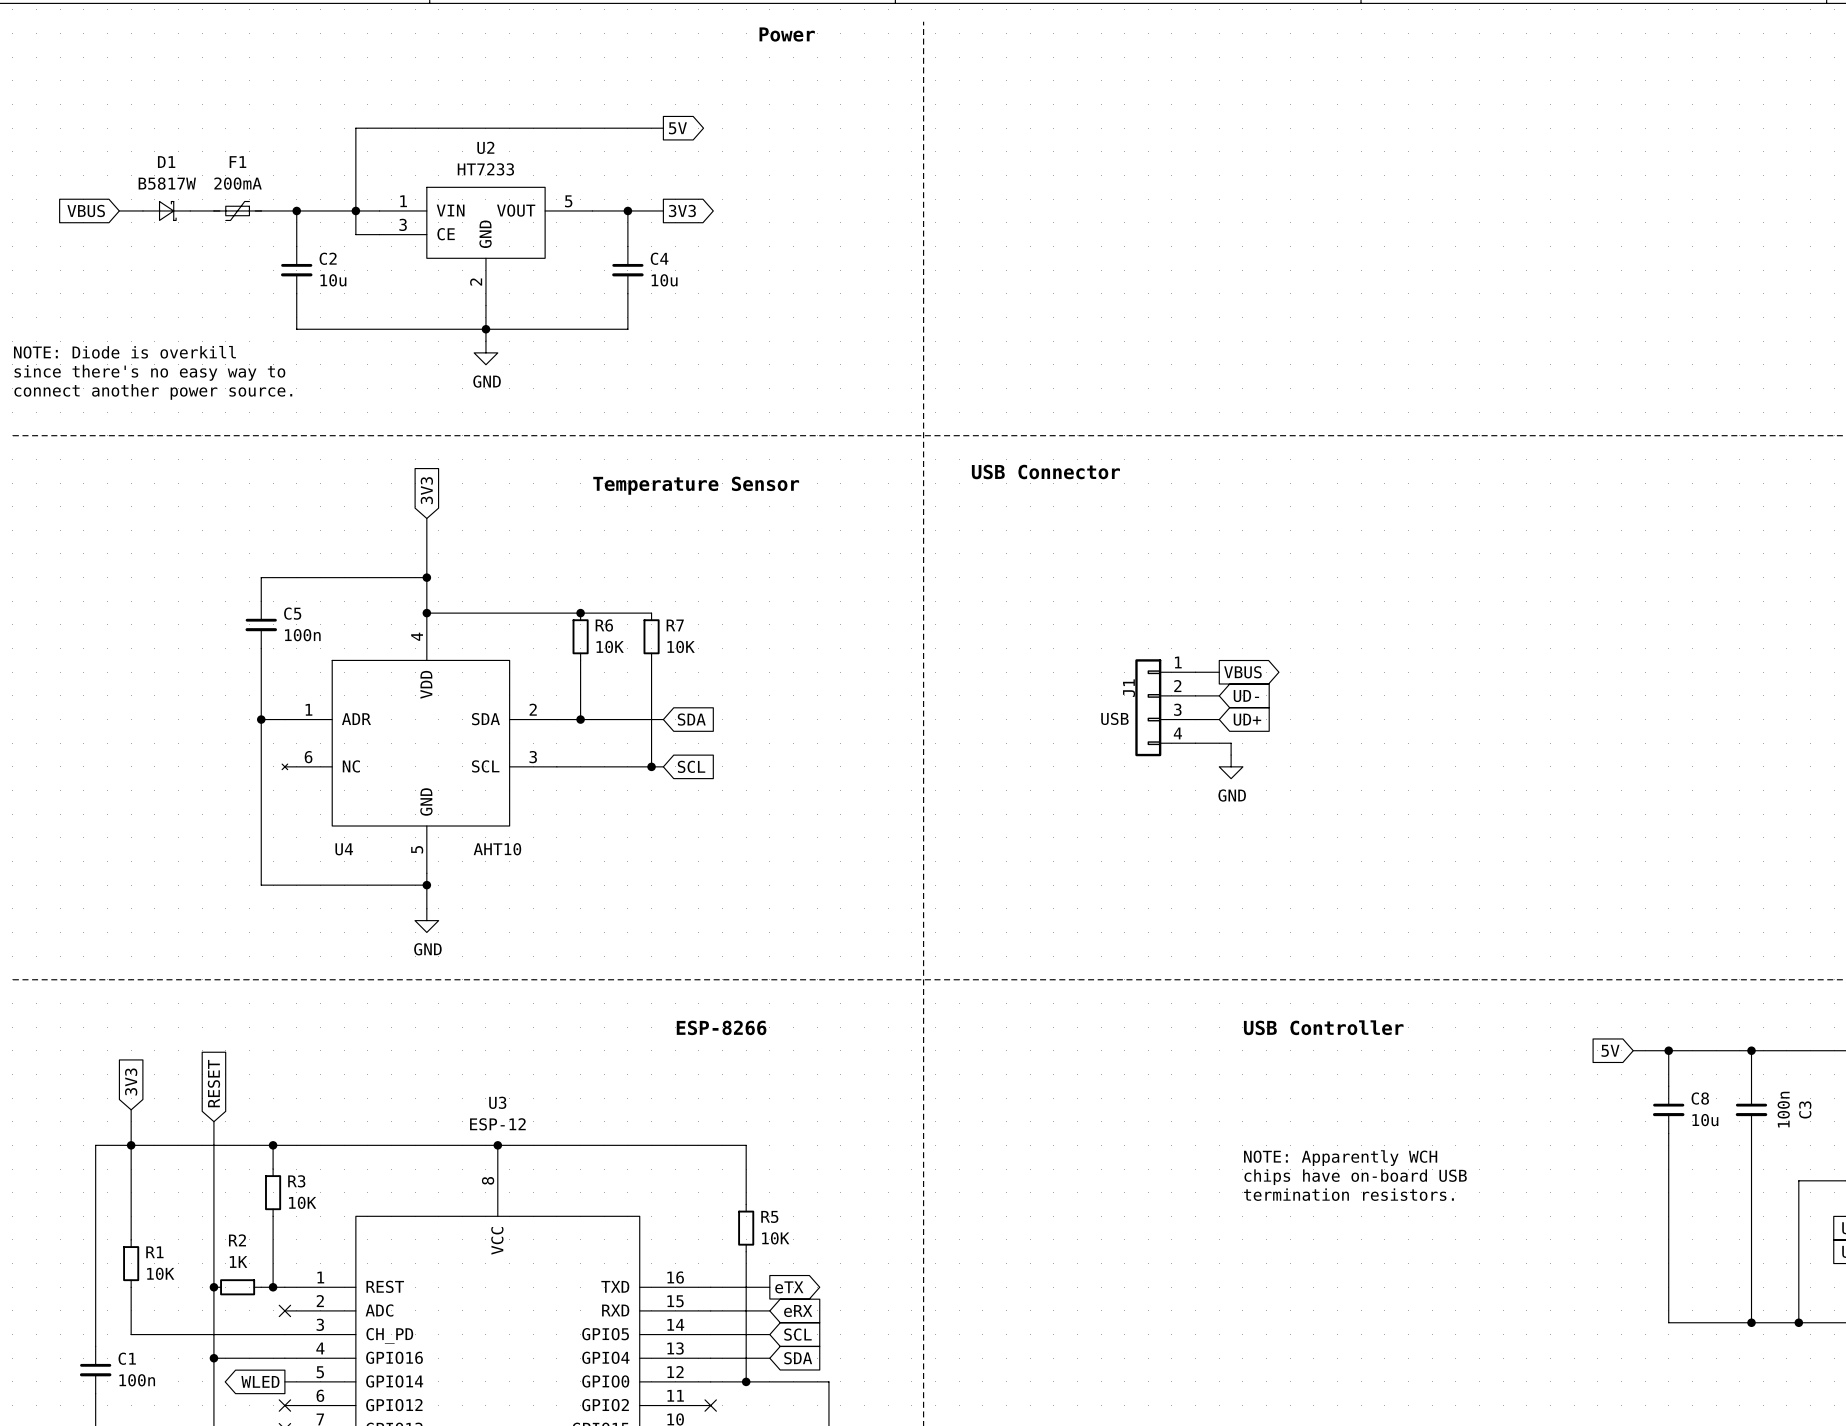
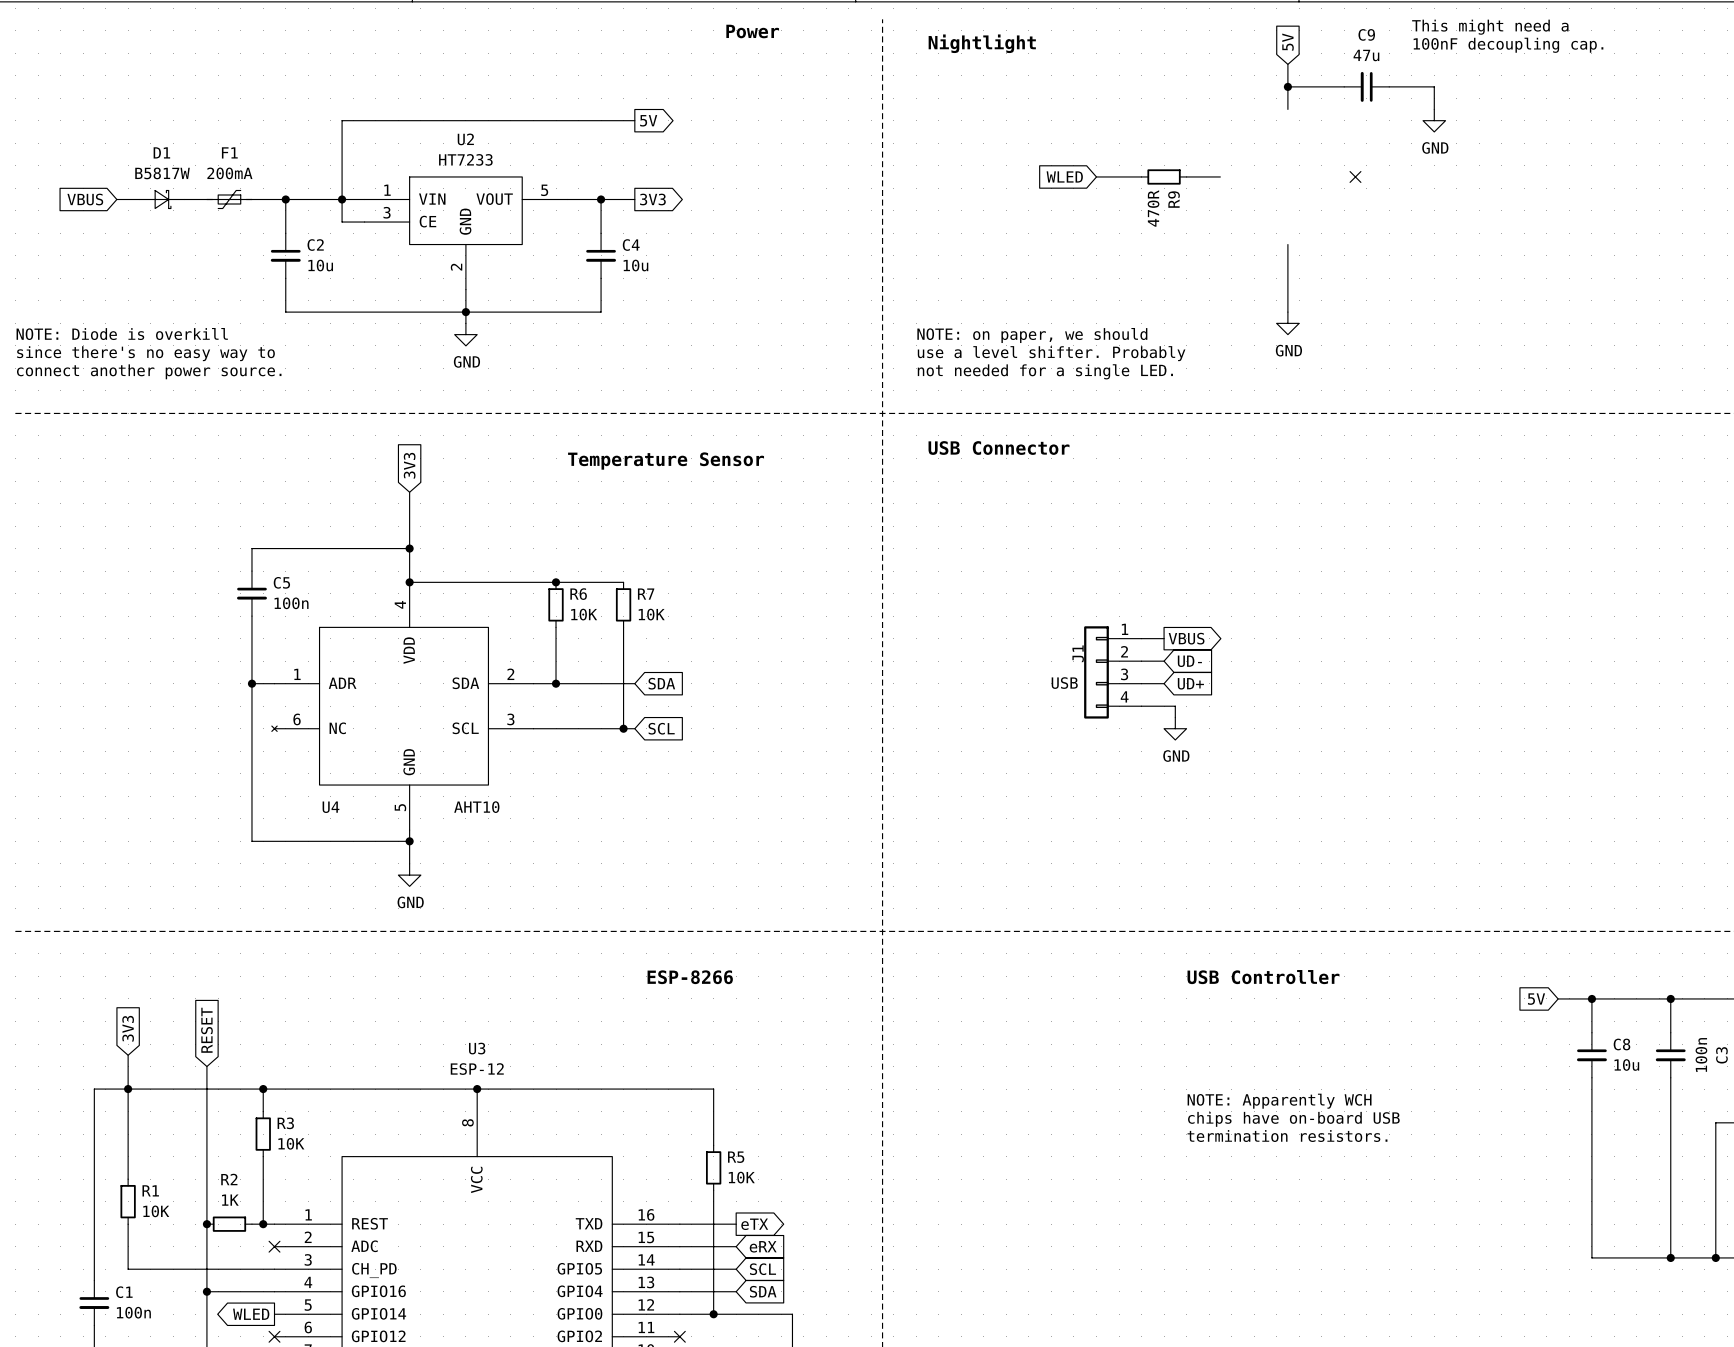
text: none -> This might need a (1490, 27)
global label: none -> 5V (1288, 42)
text: none -> Nightlight (982, 43)
text: none -> 100nF decoupling cap. (1508, 45)
wire: none -> (1287, 64) (1287, 109)
wire: none -> (1287, 86) (1344, 86)
junction: none -> (1287, 86)
C9: none -> 47u (1366, 86)
wire: none -> (1389, 86) (1434, 86) (1434, 109)
power symbol: none -> GND (1434, 120)
global label: none -> WLED (1064, 176)
wire: none -> (1096, 176) (1141, 176)
R9: none -> 470R (1164, 176)
wire: none -> (1186, 176) (1220, 176)
no-connect mark: none -> (1355, 176)
wire: none -> (1287, 244) (1287, 312)
power symbol: none -> GND (1287, 323)
text: none -> NOTE: on paper, we should (1032, 335)
text: none -> use a level shifter. Probably (1051, 353)
text: none -> not needed for a single LED. (1045, 371)

